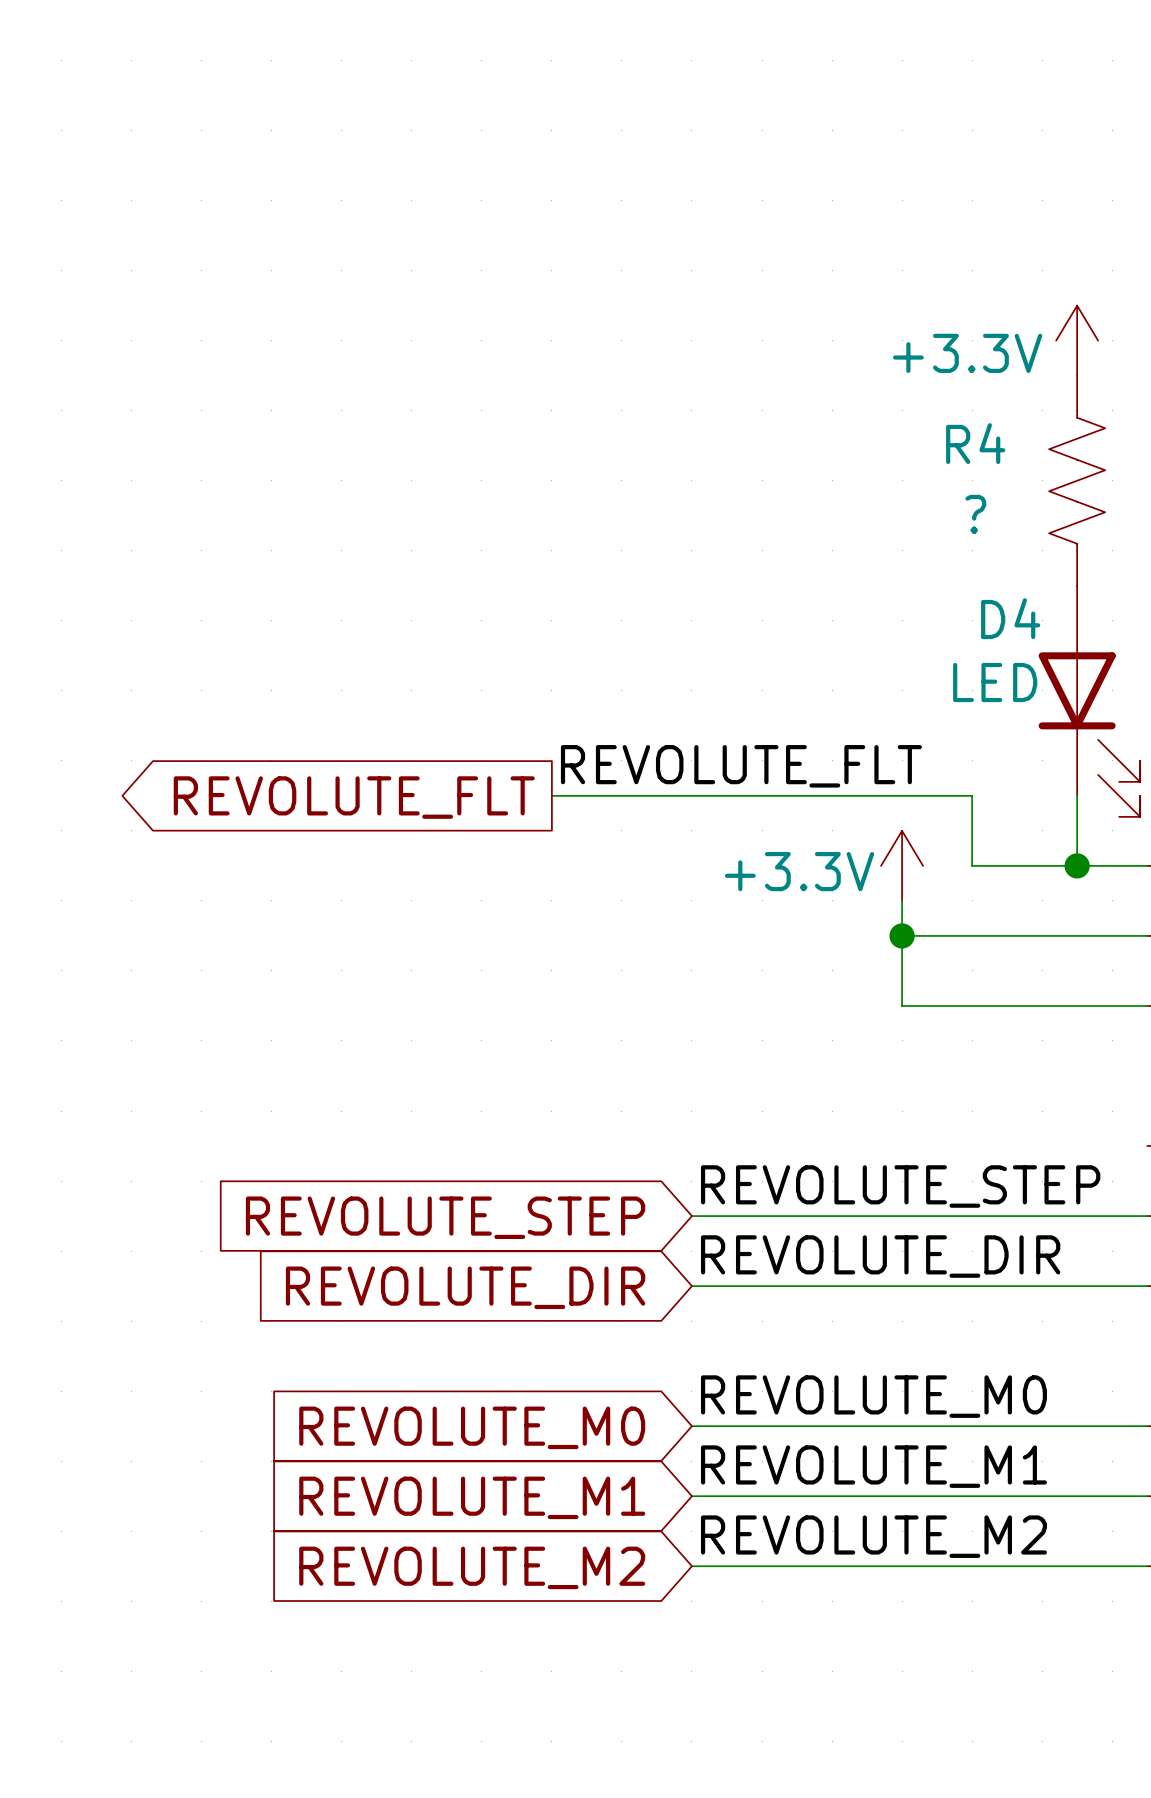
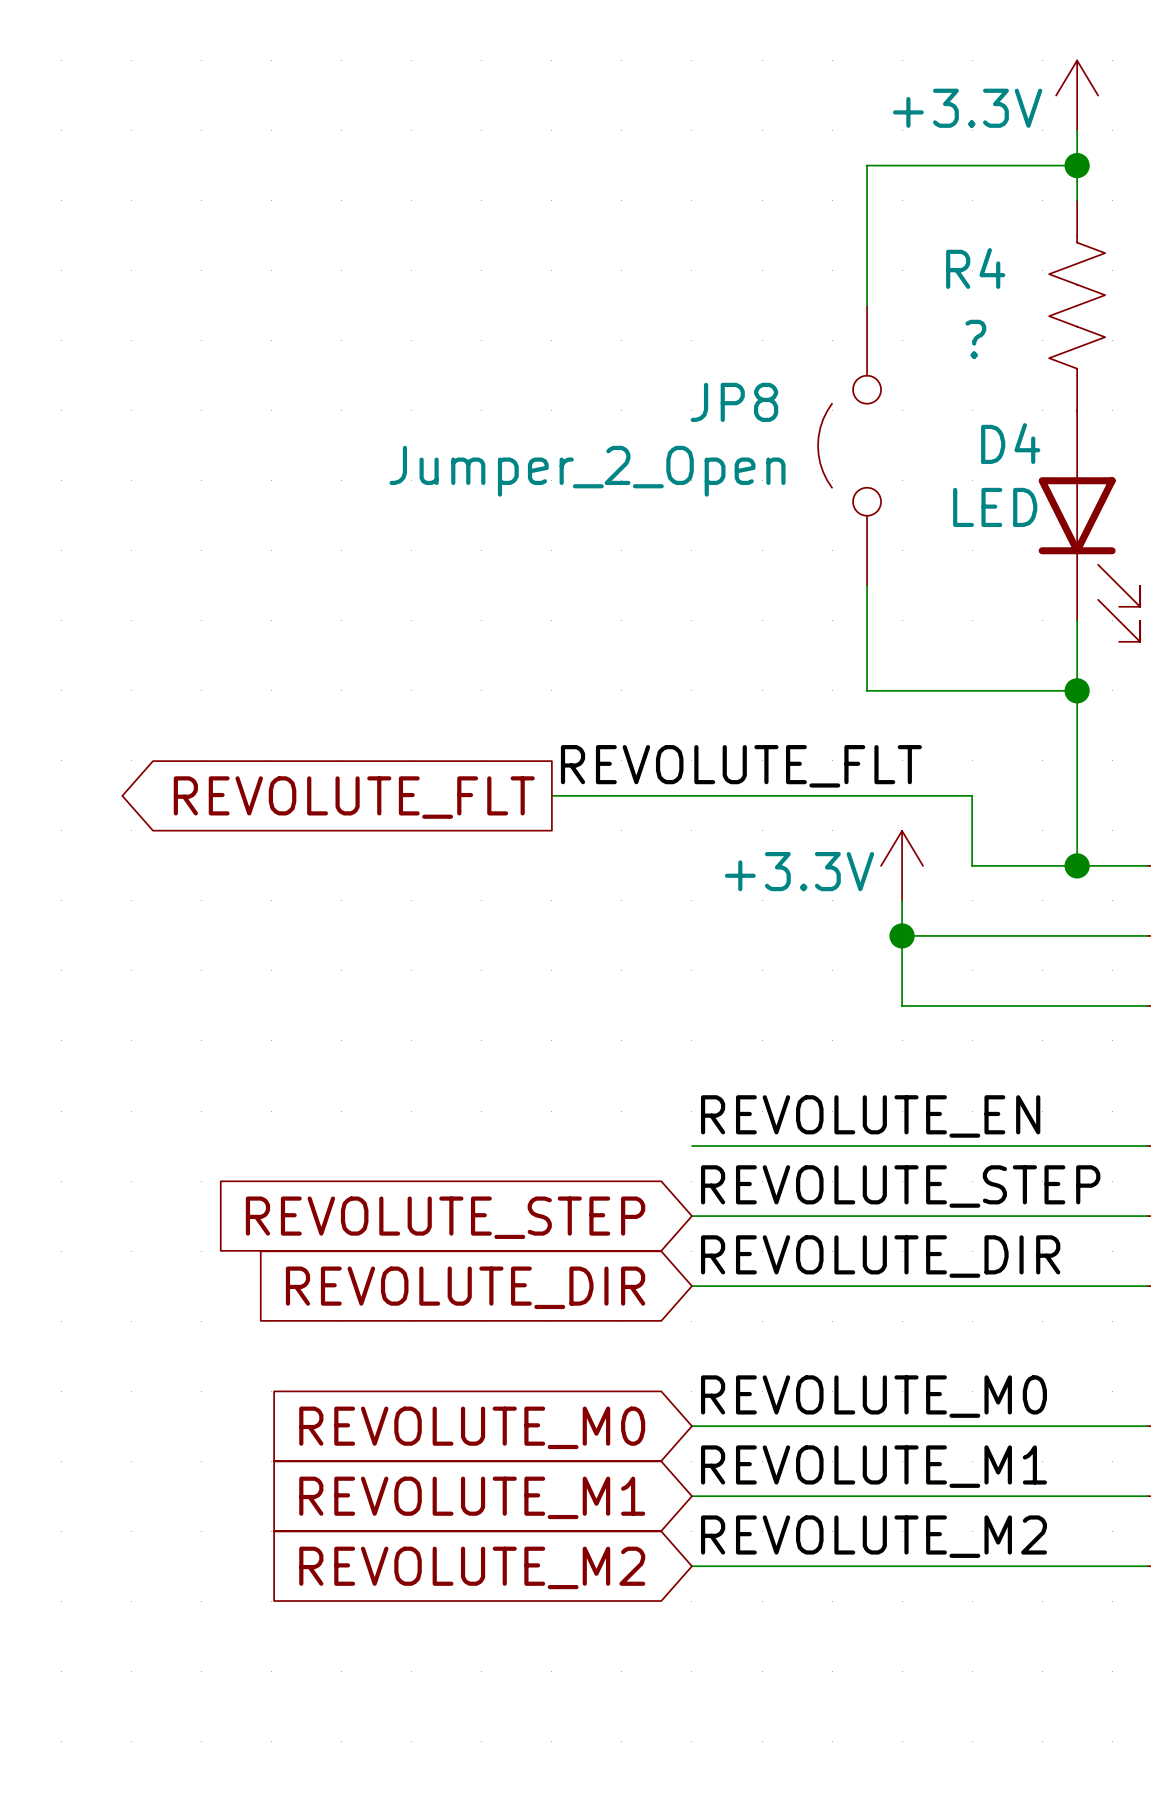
wire: none -> (1077, 130) (1077, 200)
wire: none -> (1077, 165) (867, 165) (867, 305)
junction: none -> (1077, 165)
power symbol position: +3.3V (1077, 340) -> +3.3V (1077, 95)
JP8: none -> Jumper_2_Open (849, 445)
R4 position: (1077, 480) -> (1077, 305)
wire: none -> (867, 585) (867, 690) (1077, 690)
junction: none -> (1077, 690)
D4 position: (1089, 701) -> (1089, 526)
label: none -> REVOLUTE_EN (870, 1116)
wire: none -> (691, 1146) (1147, 1146)

